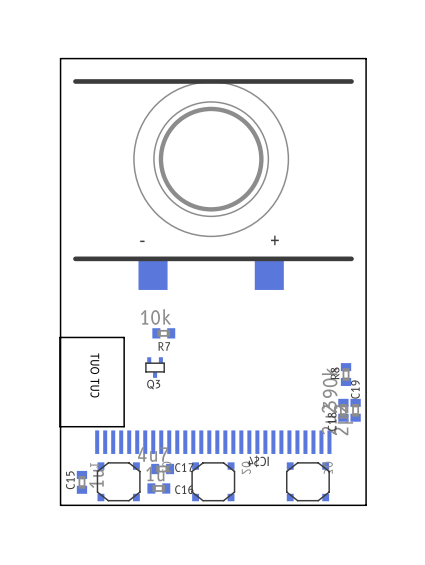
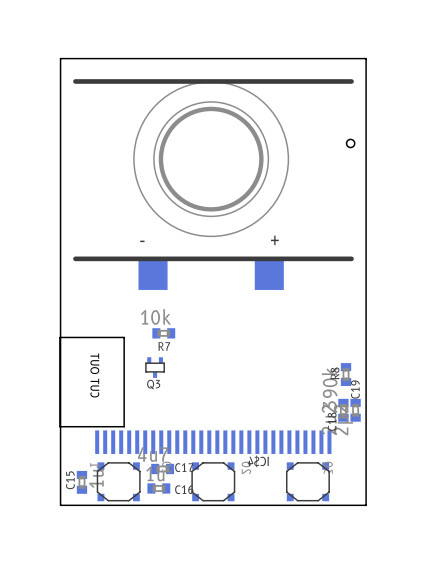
hole: none -> (350, 143)

